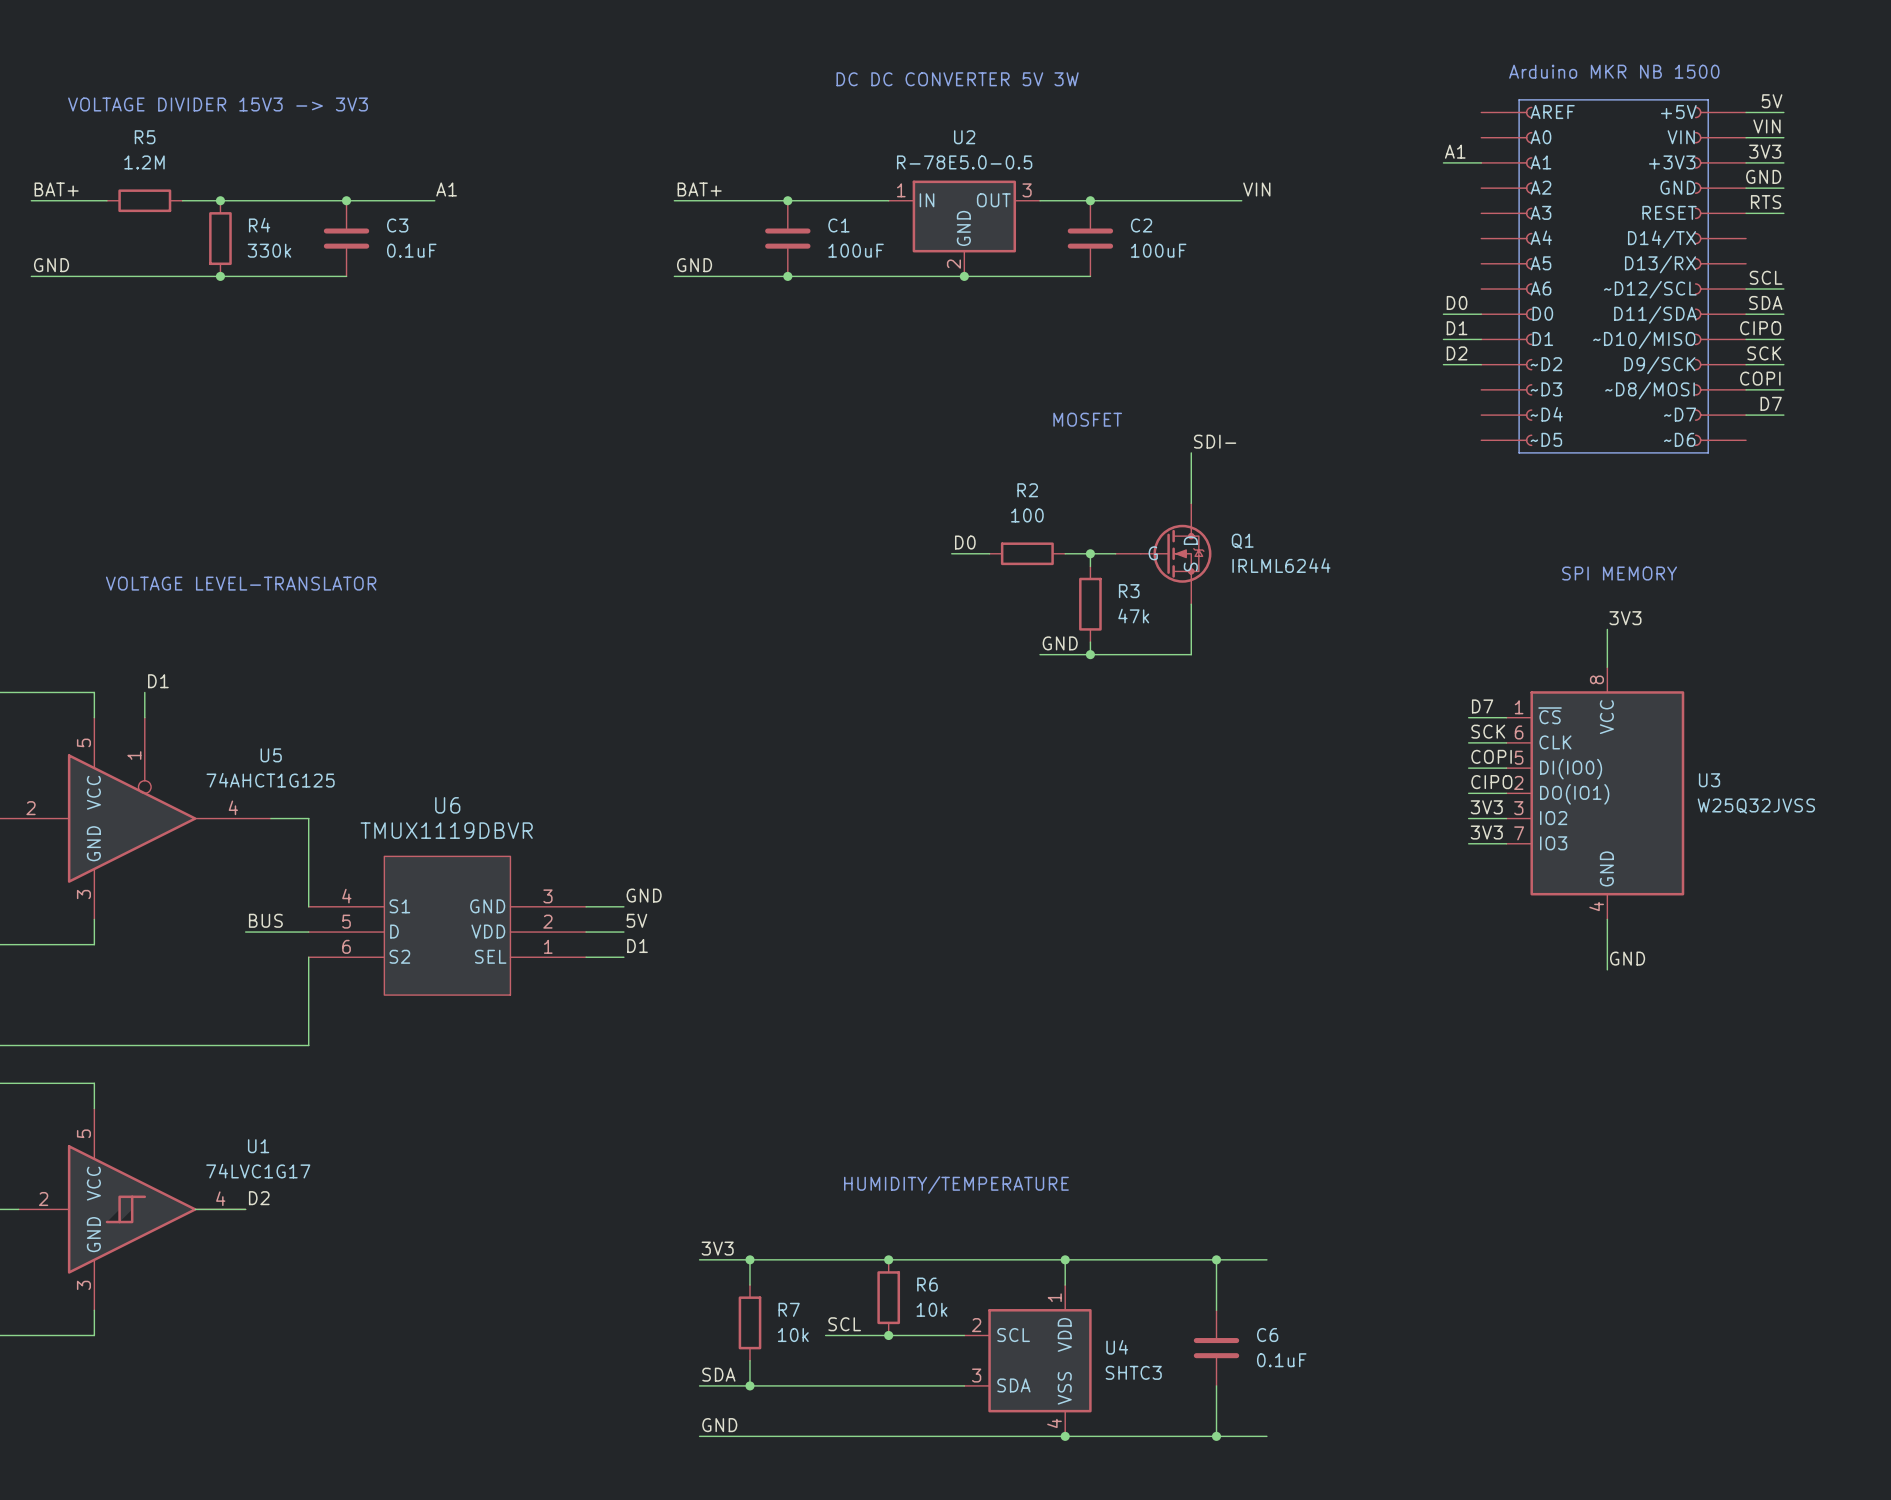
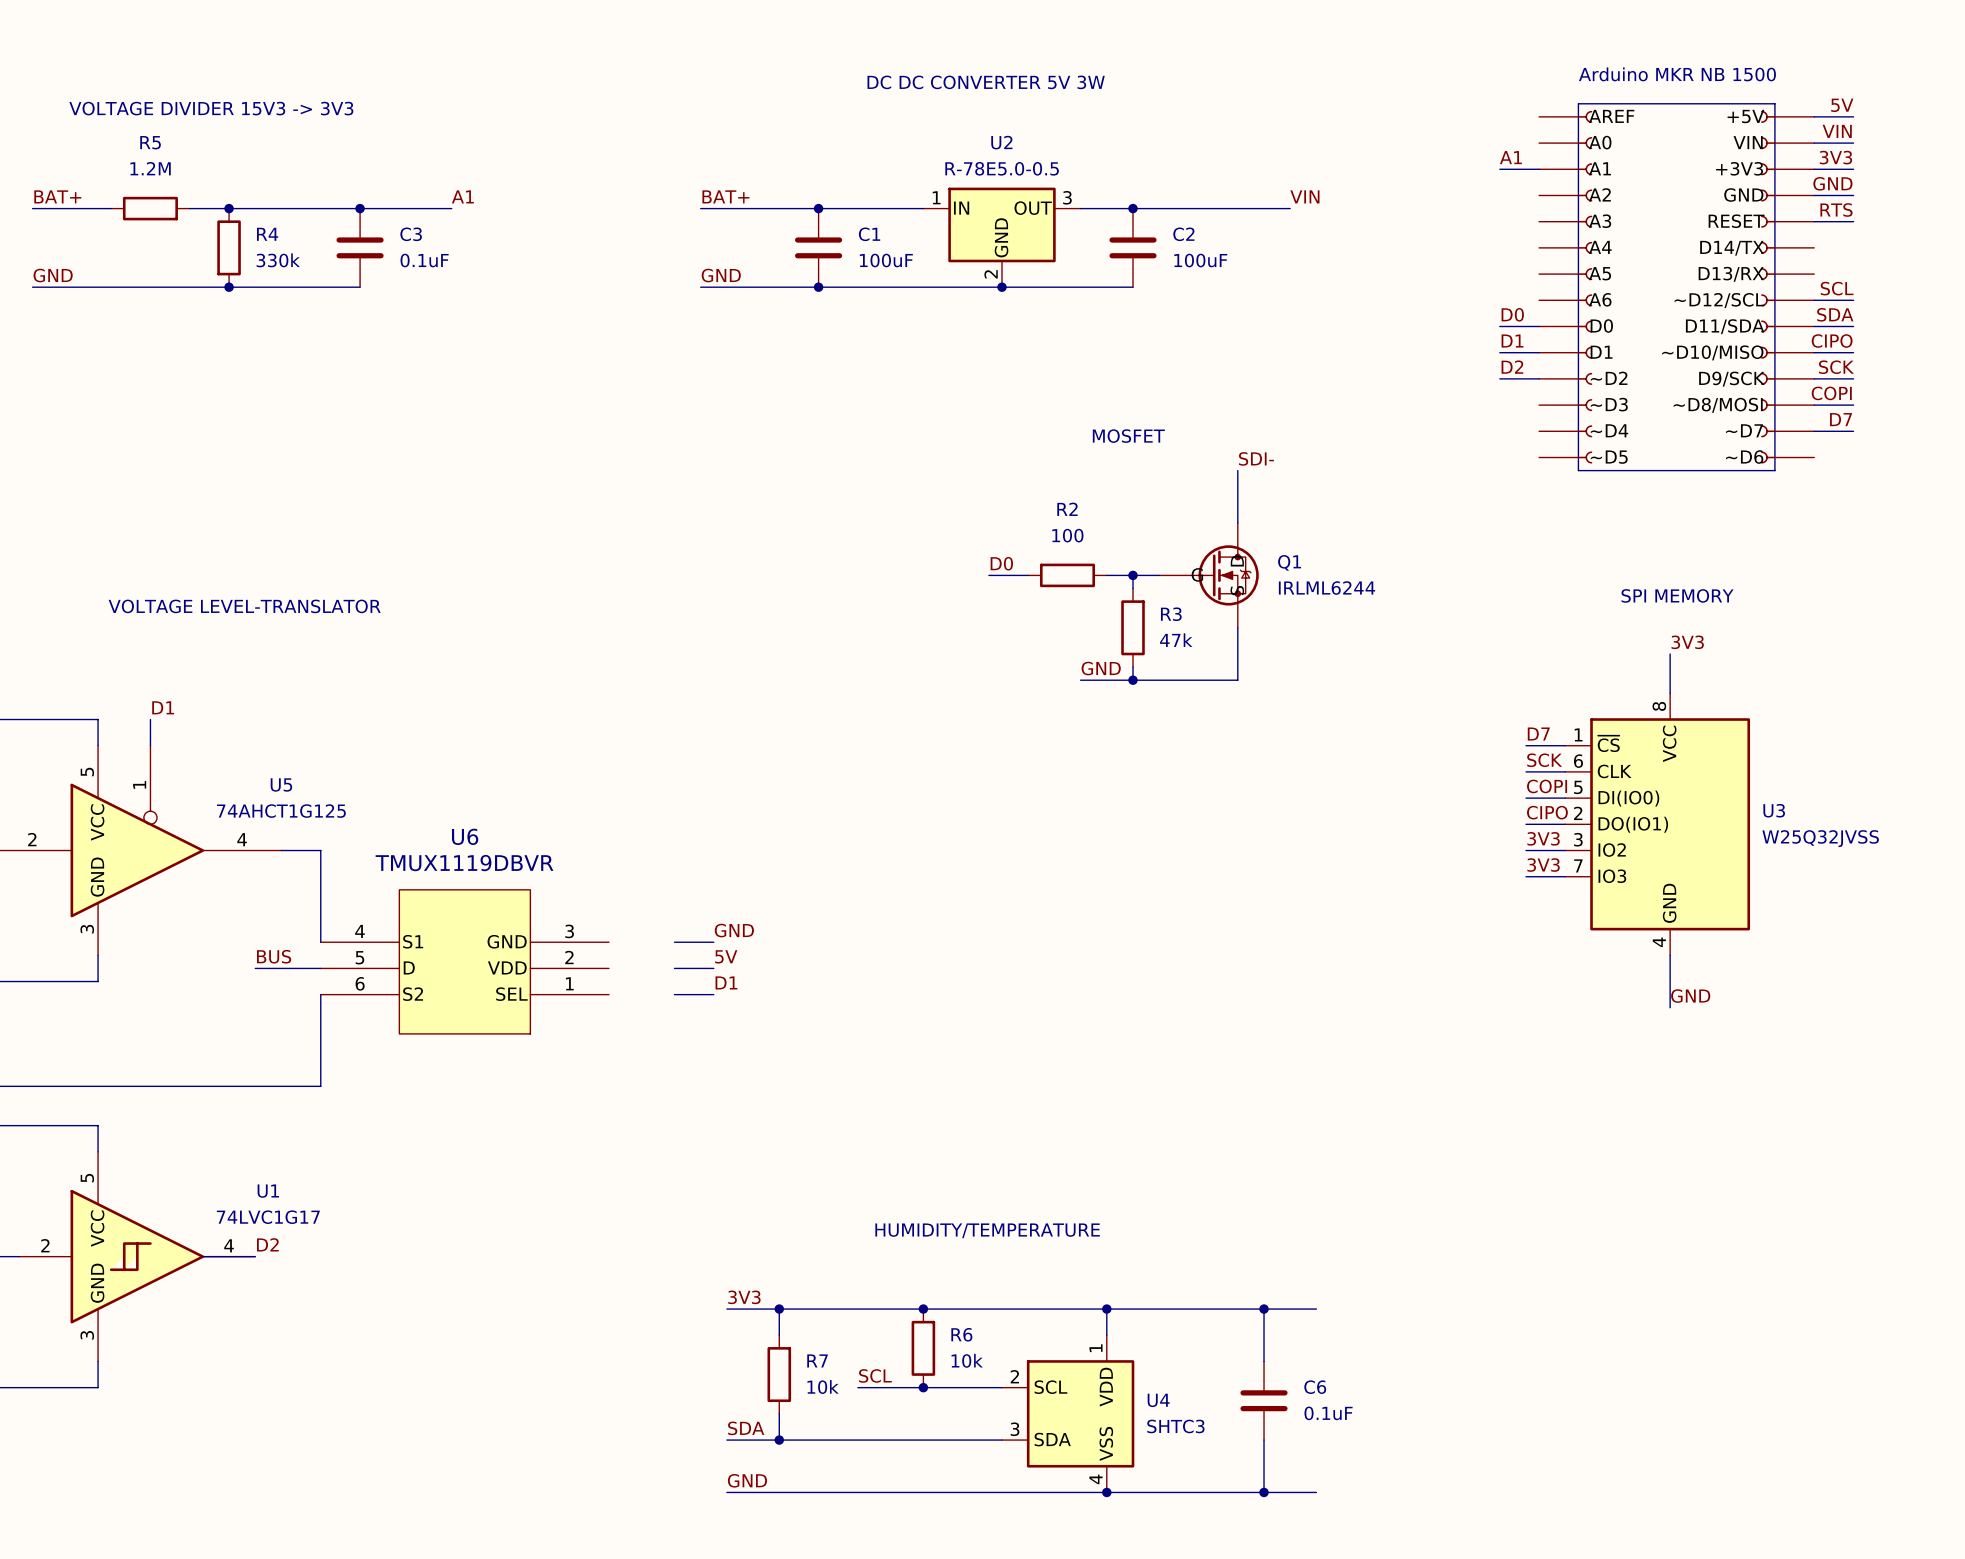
label position: GND (644, 895) -> GND (734, 930)
wire: (586, 906) (623, 906) -> (674, 942) (713, 942)
label position: 5V (636, 920) -> 5V (726, 956)
wire: (586, 932) (623, 932) -> (674, 968) (713, 968)
label position: D1 (637, 945) -> D1 (726, 982)
wire: (586, 957) (623, 957) -> (674, 994) (713, 994)

